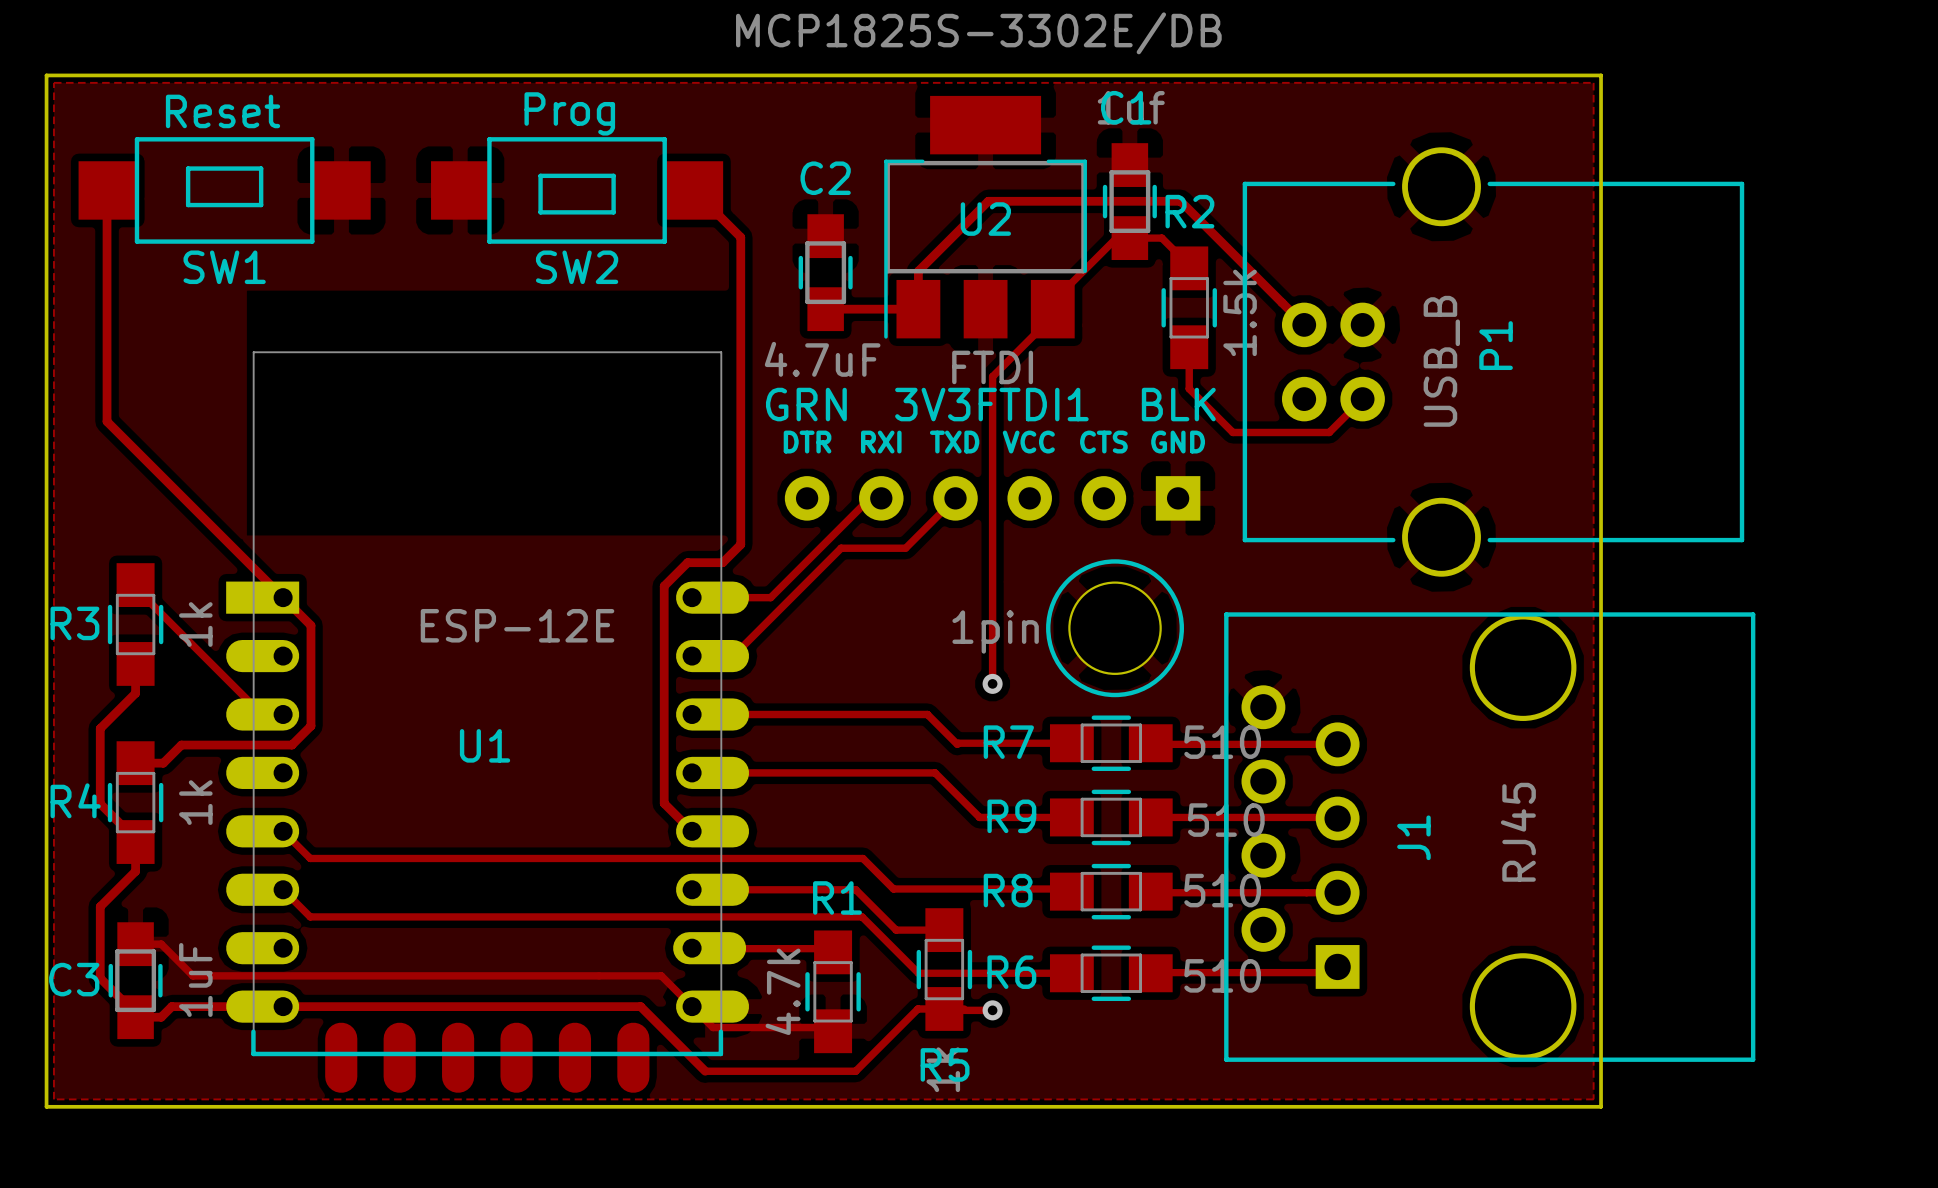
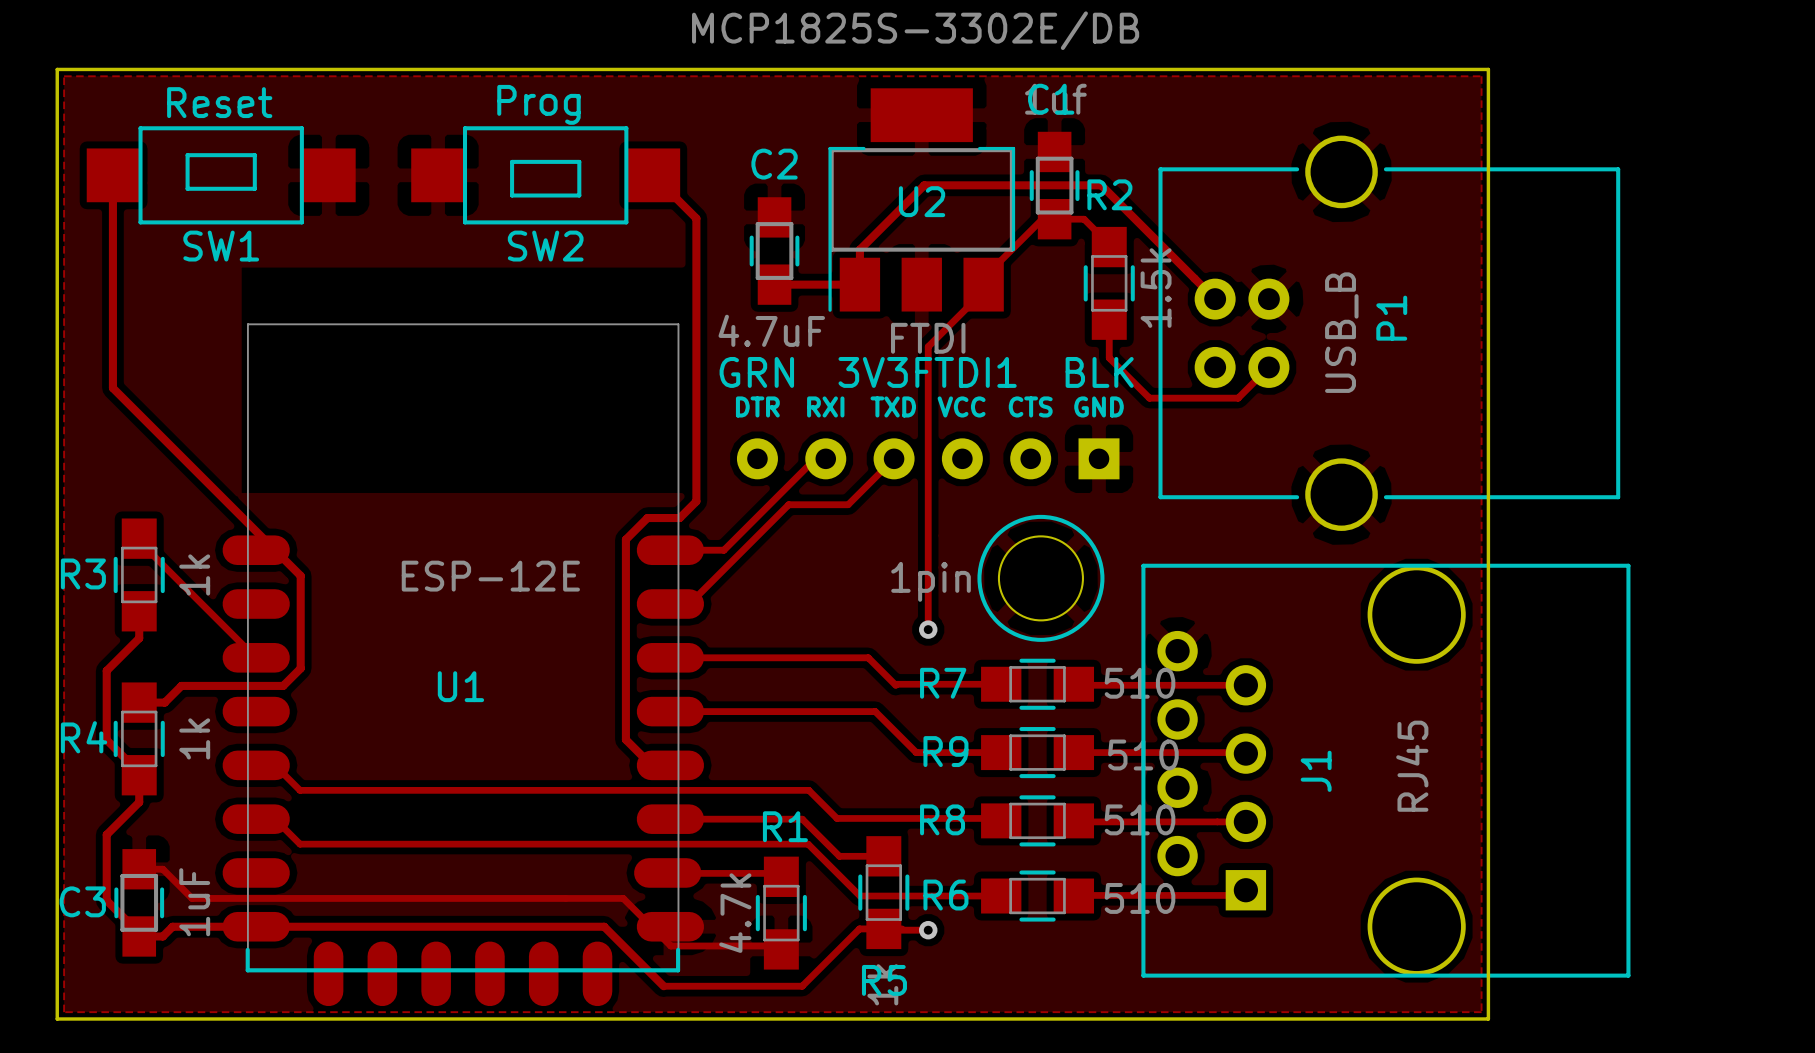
U1 footprint: [226, 351, 750, 1093] -> [222, 323, 705, 1007]

